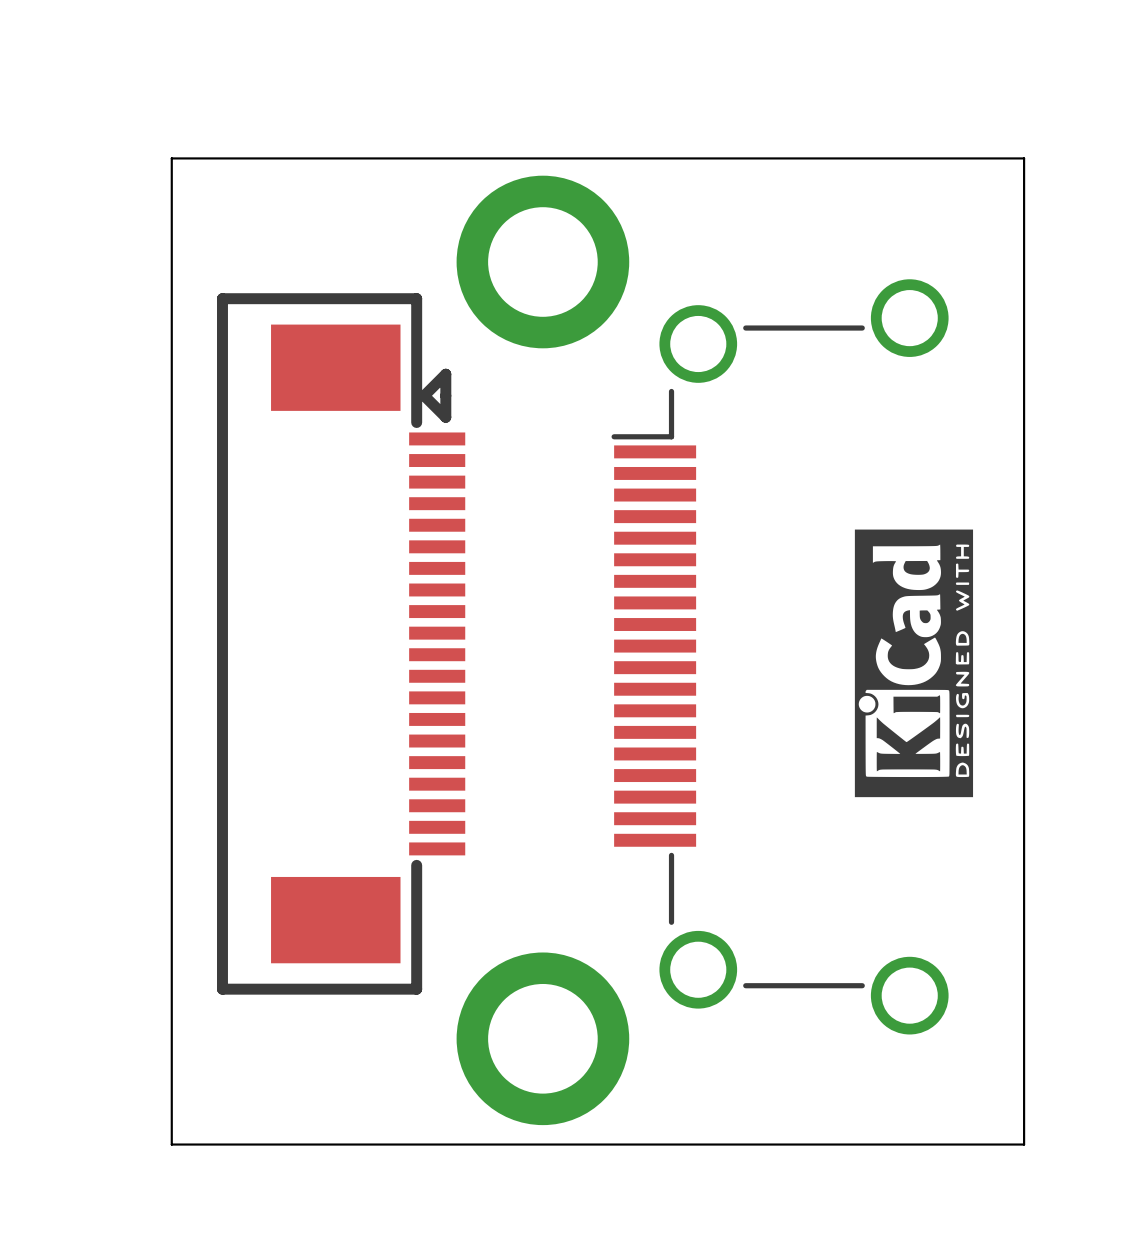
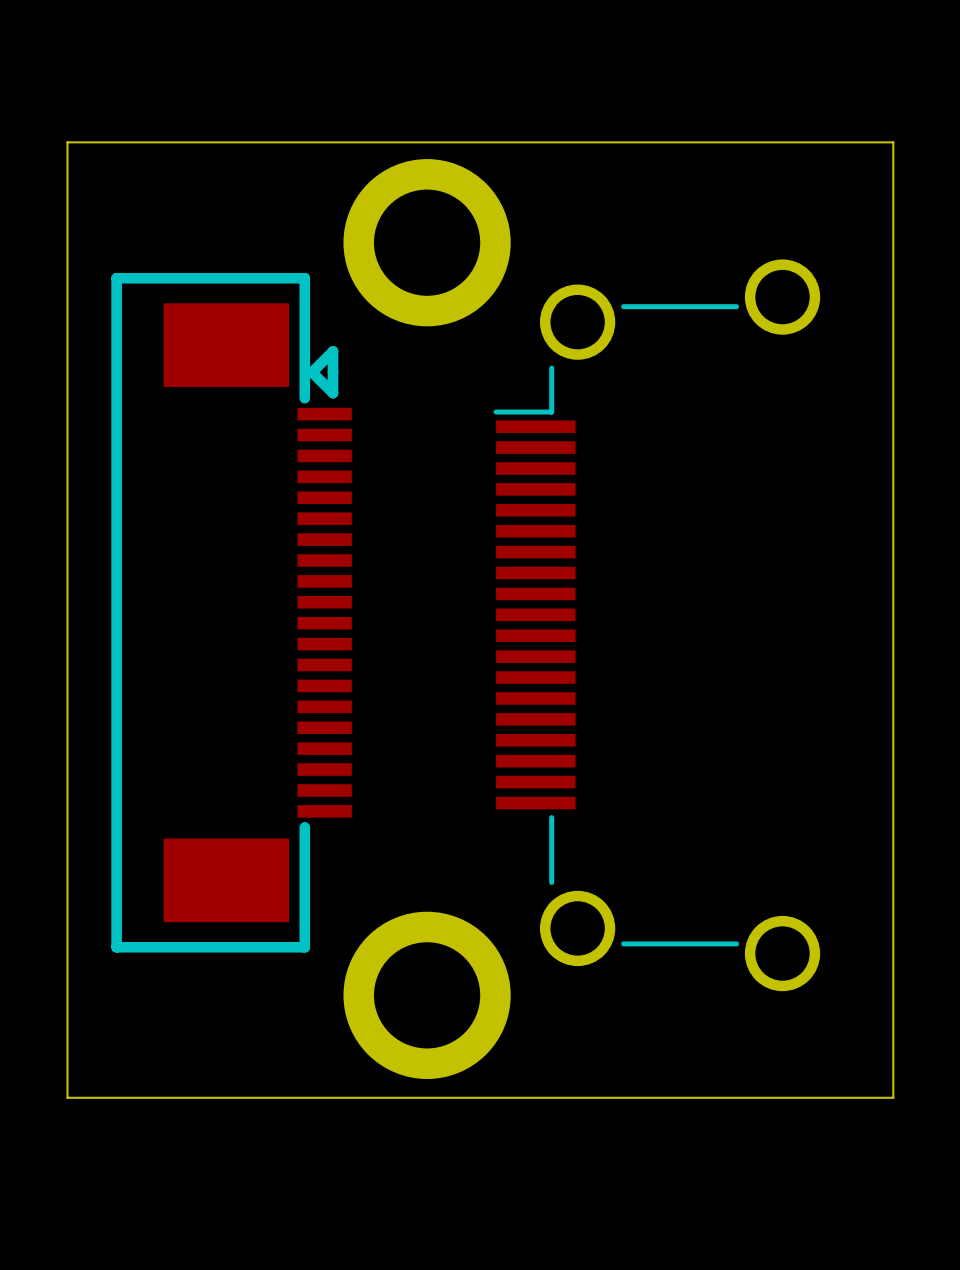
drawing: [854, 529, 974, 798] -> none

